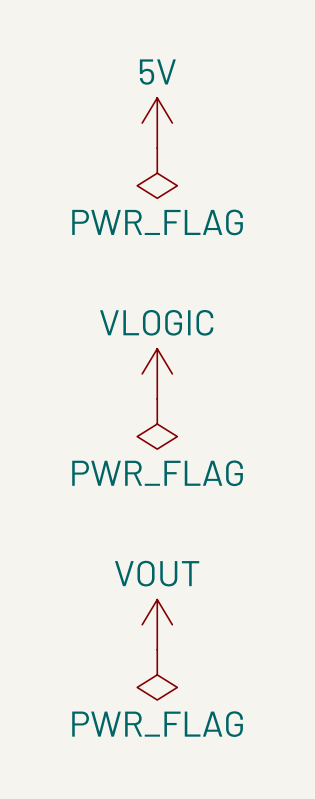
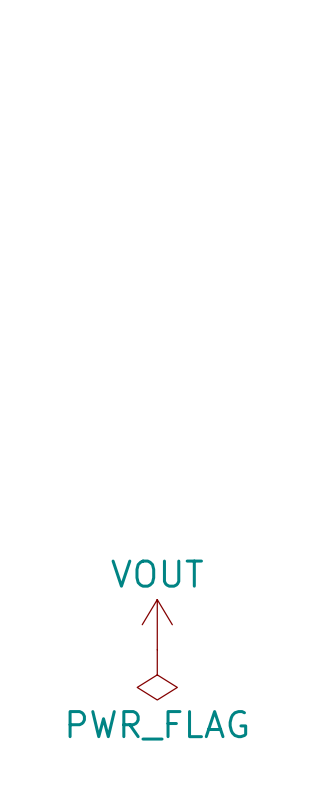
power symbol: 5V (157, 123) -> none
power symbol: PWR_FLAG (157, 173) -> none
power symbol: VLOGIC (157, 373) -> none
power symbol: PWR_FLAG (157, 424) -> none

